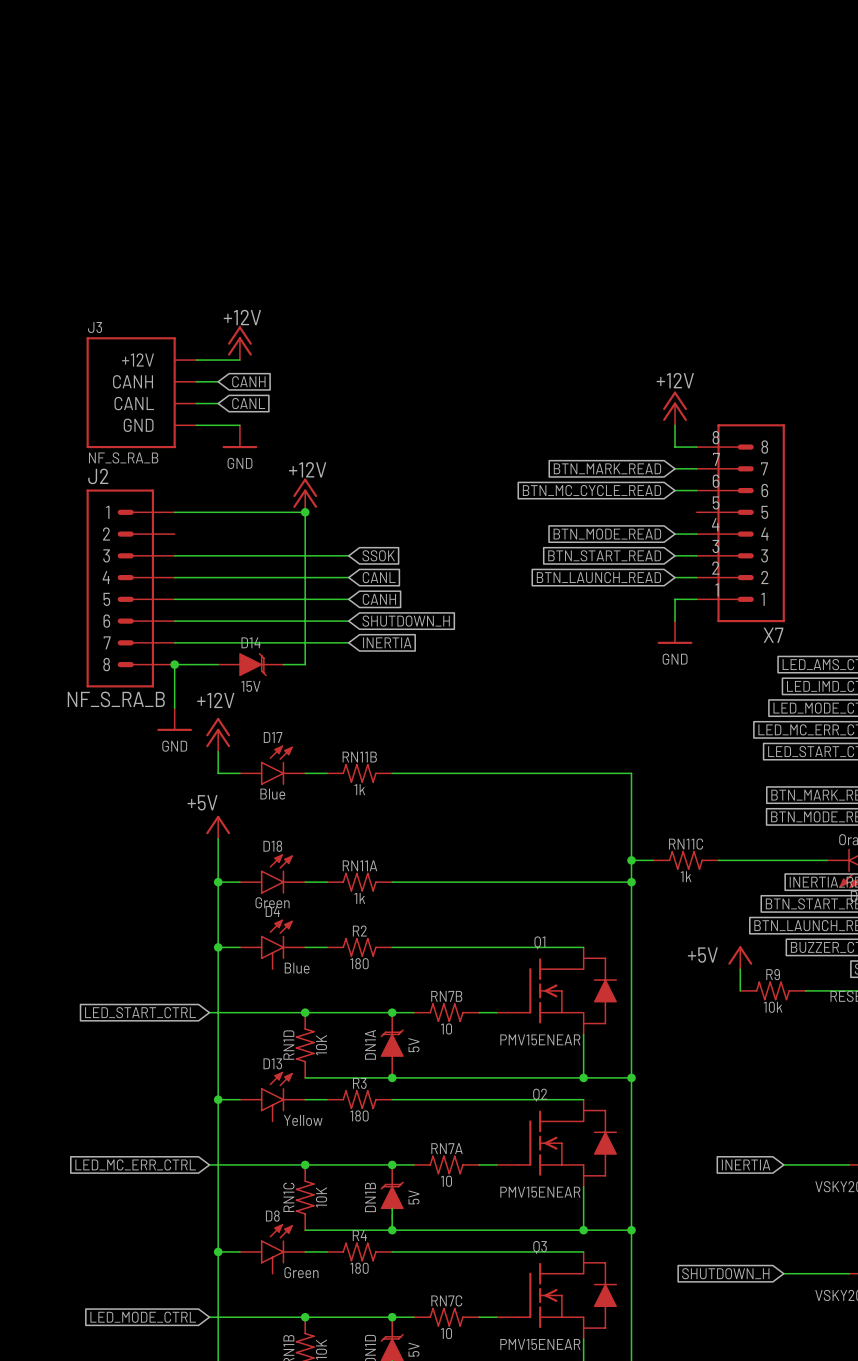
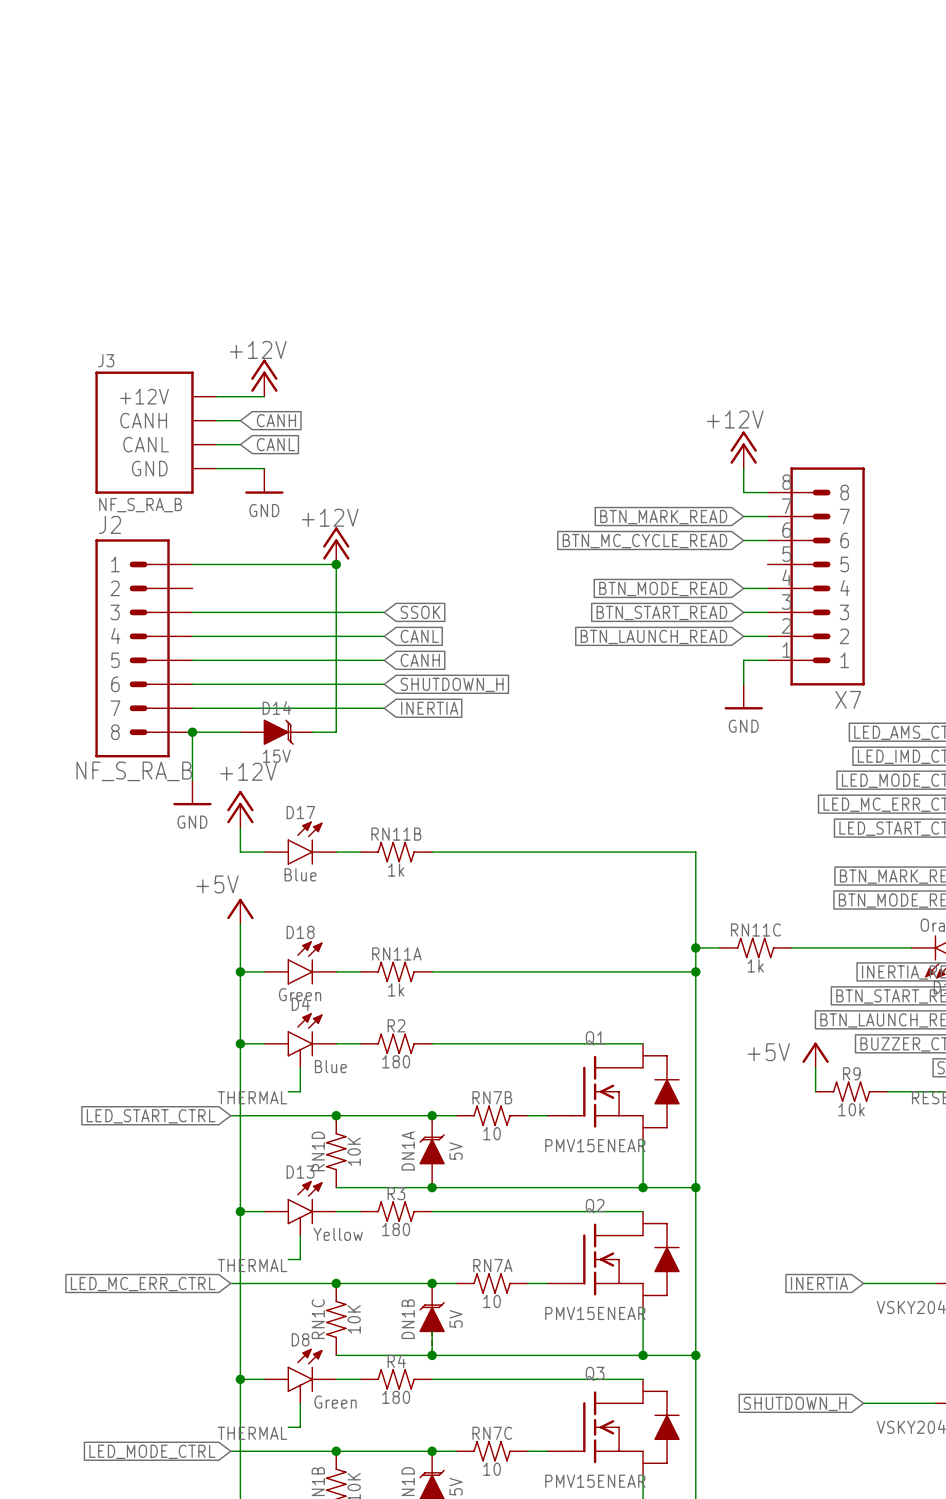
wire: none -> (300, 1067) (300, 1091) (288, 1091)
label: none -> THERMAL (252, 1097)
wire: none -> (300, 1235) (300, 1259) (288, 1259)
label: none -> THERMAL (252, 1265)
wire: none -> (300, 1403) (300, 1427) (288, 1427)
label: none -> THERMAL (252, 1433)

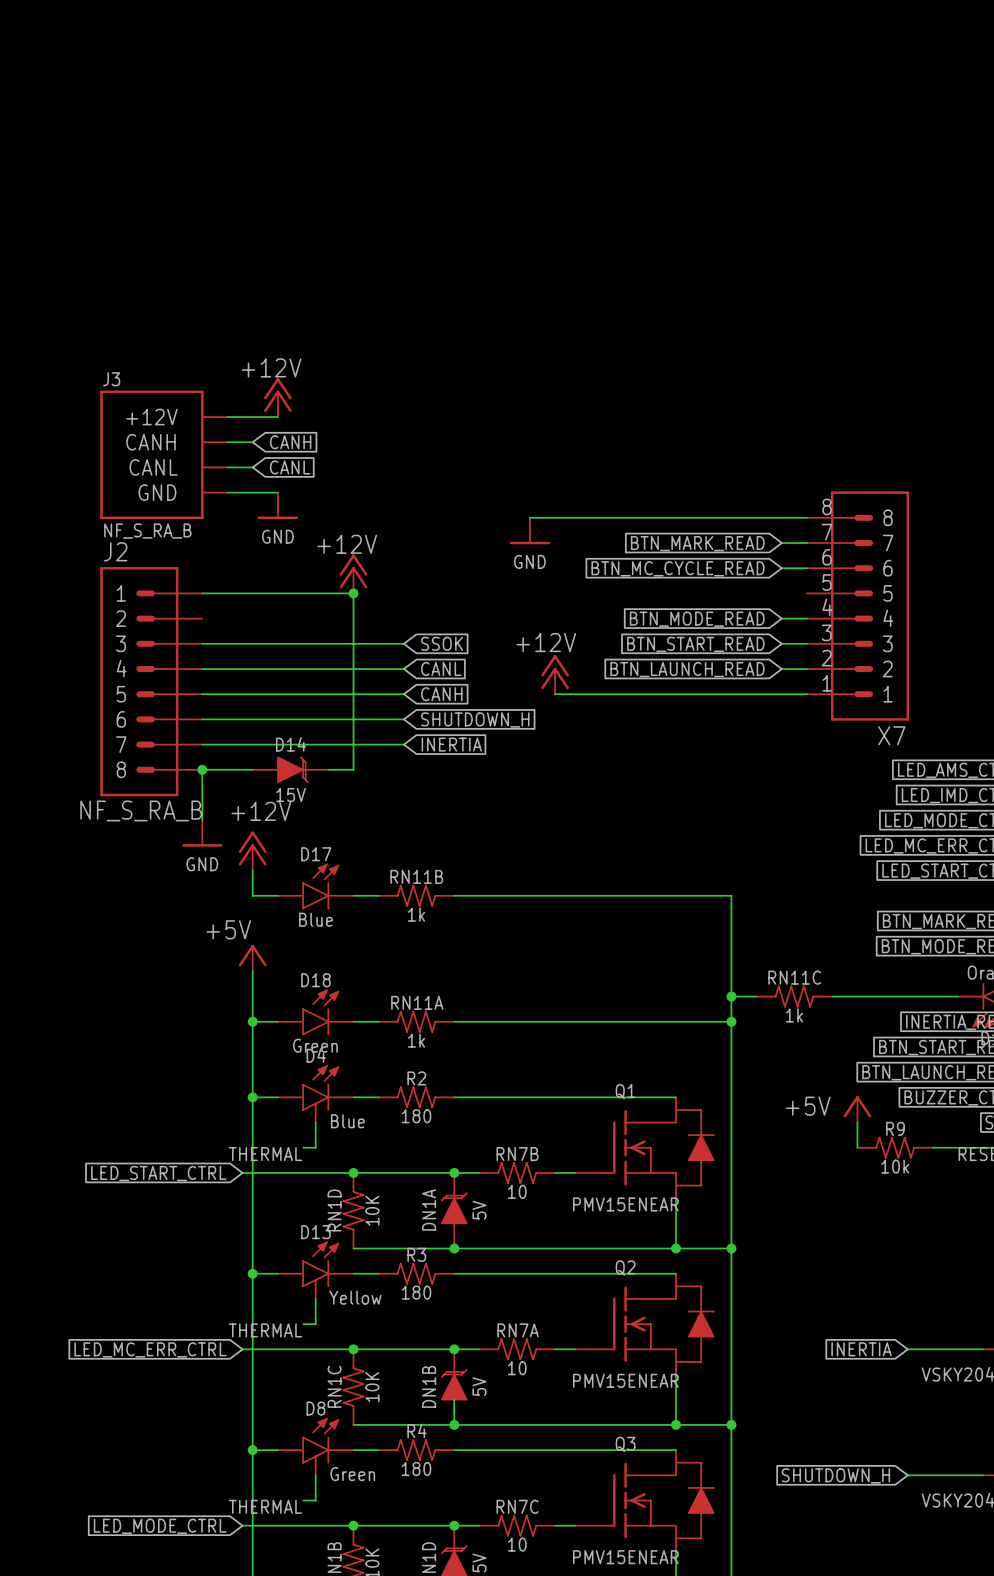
power symbol: +12V (743, 450) -> none
wire: (743, 468) (743, 492) -> (529, 517) (781, 517)
power symbol: none -> GND (529, 531)
power symbol: none -> +12V (555, 674)
wire: (743, 660) (743, 684) -> (781, 694) (555, 694)
power symbol: GND (743, 696) -> none

